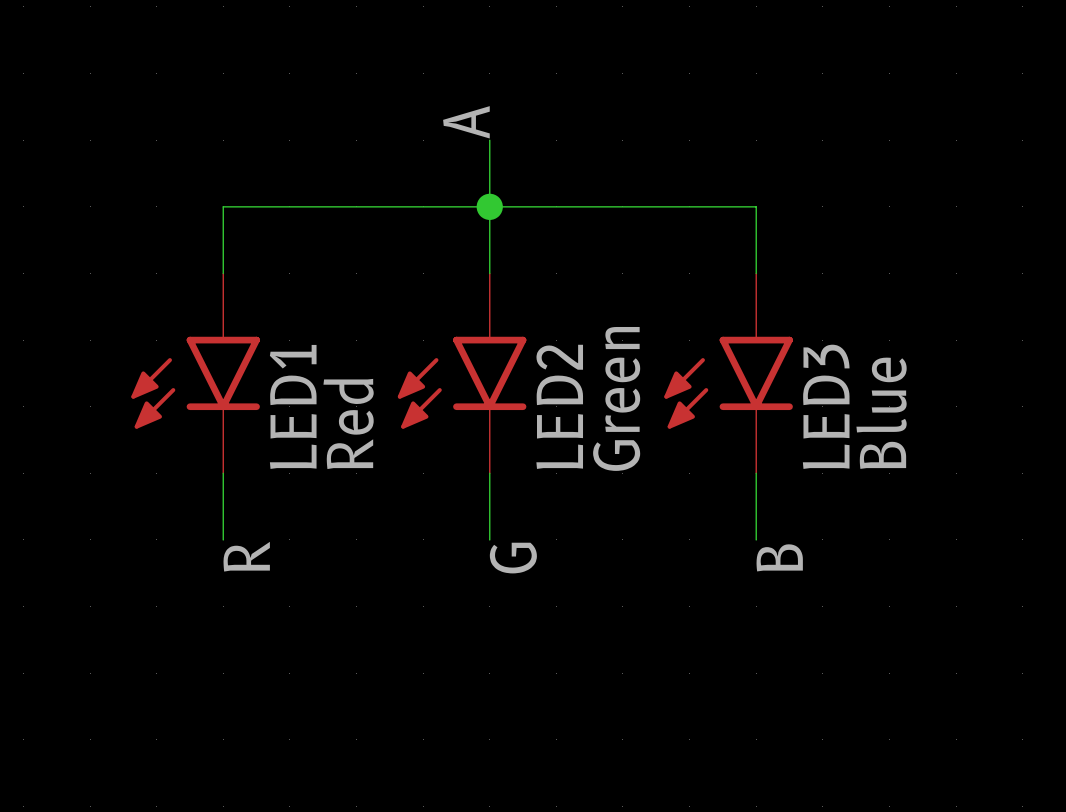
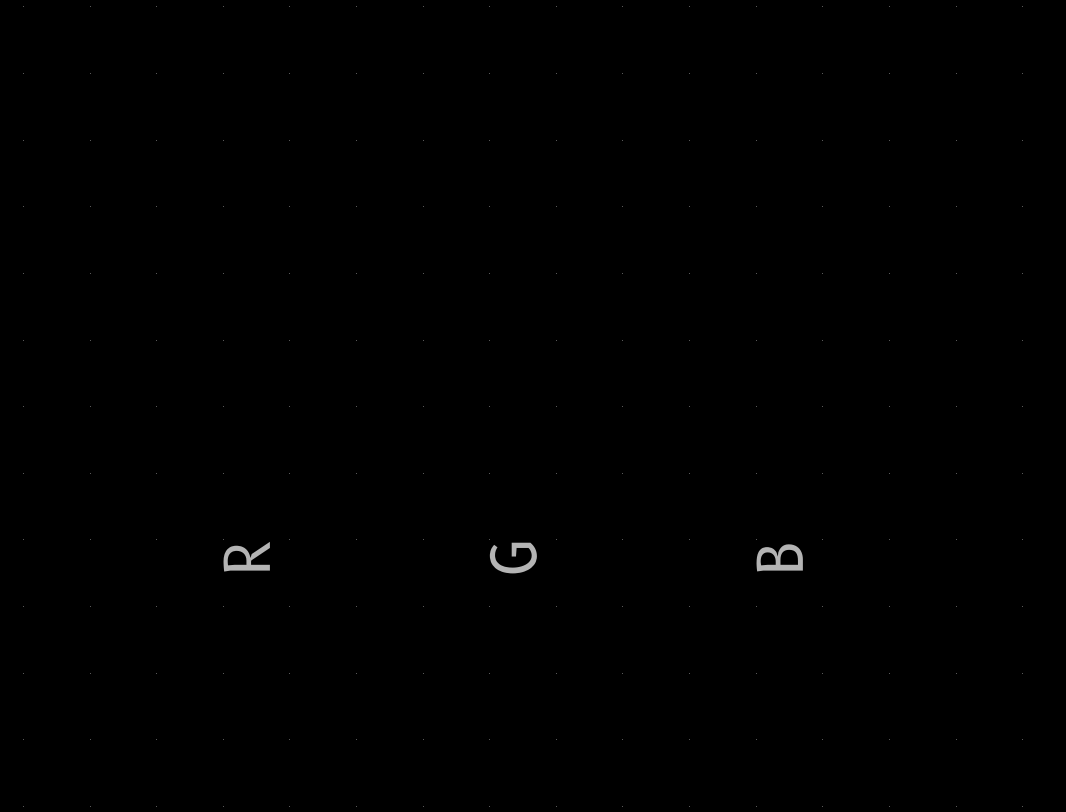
label: A (466, 122) -> none
wire: (489, 140) (489, 273) -> none
junction: (489, 206) -> none
wire: (223, 273) (223, 206) (756, 206) (756, 273) -> none
LED1: Red (195, 373) -> none
LED2: Green (462, 373) -> none
LED3: Blue (728, 373) -> none
wire: (223, 473) (223, 539) -> none
wire: (489, 473) (489, 539) -> none
wire: (756, 473) (756, 539) -> none

